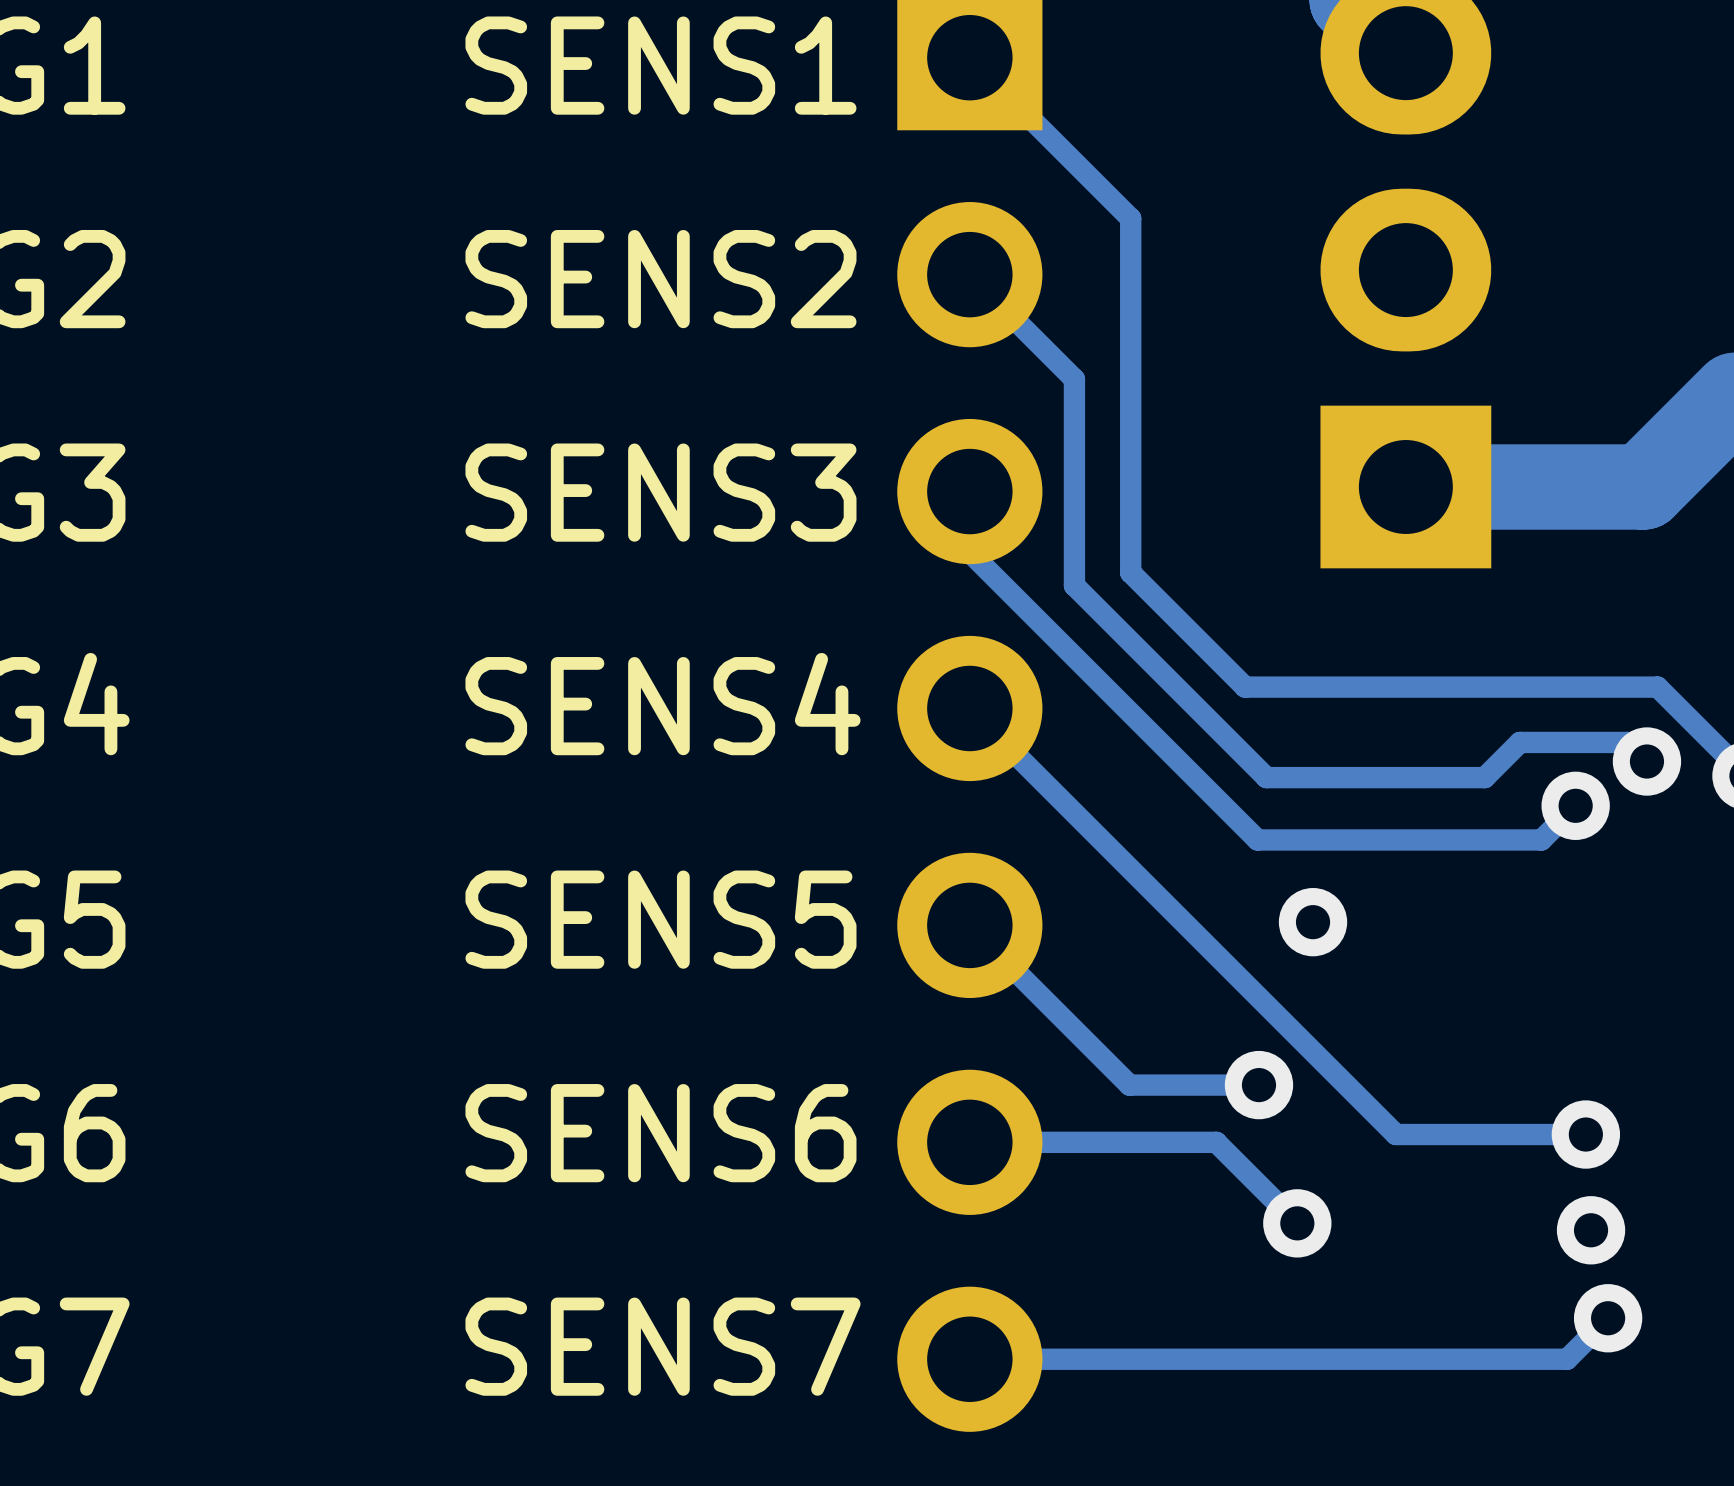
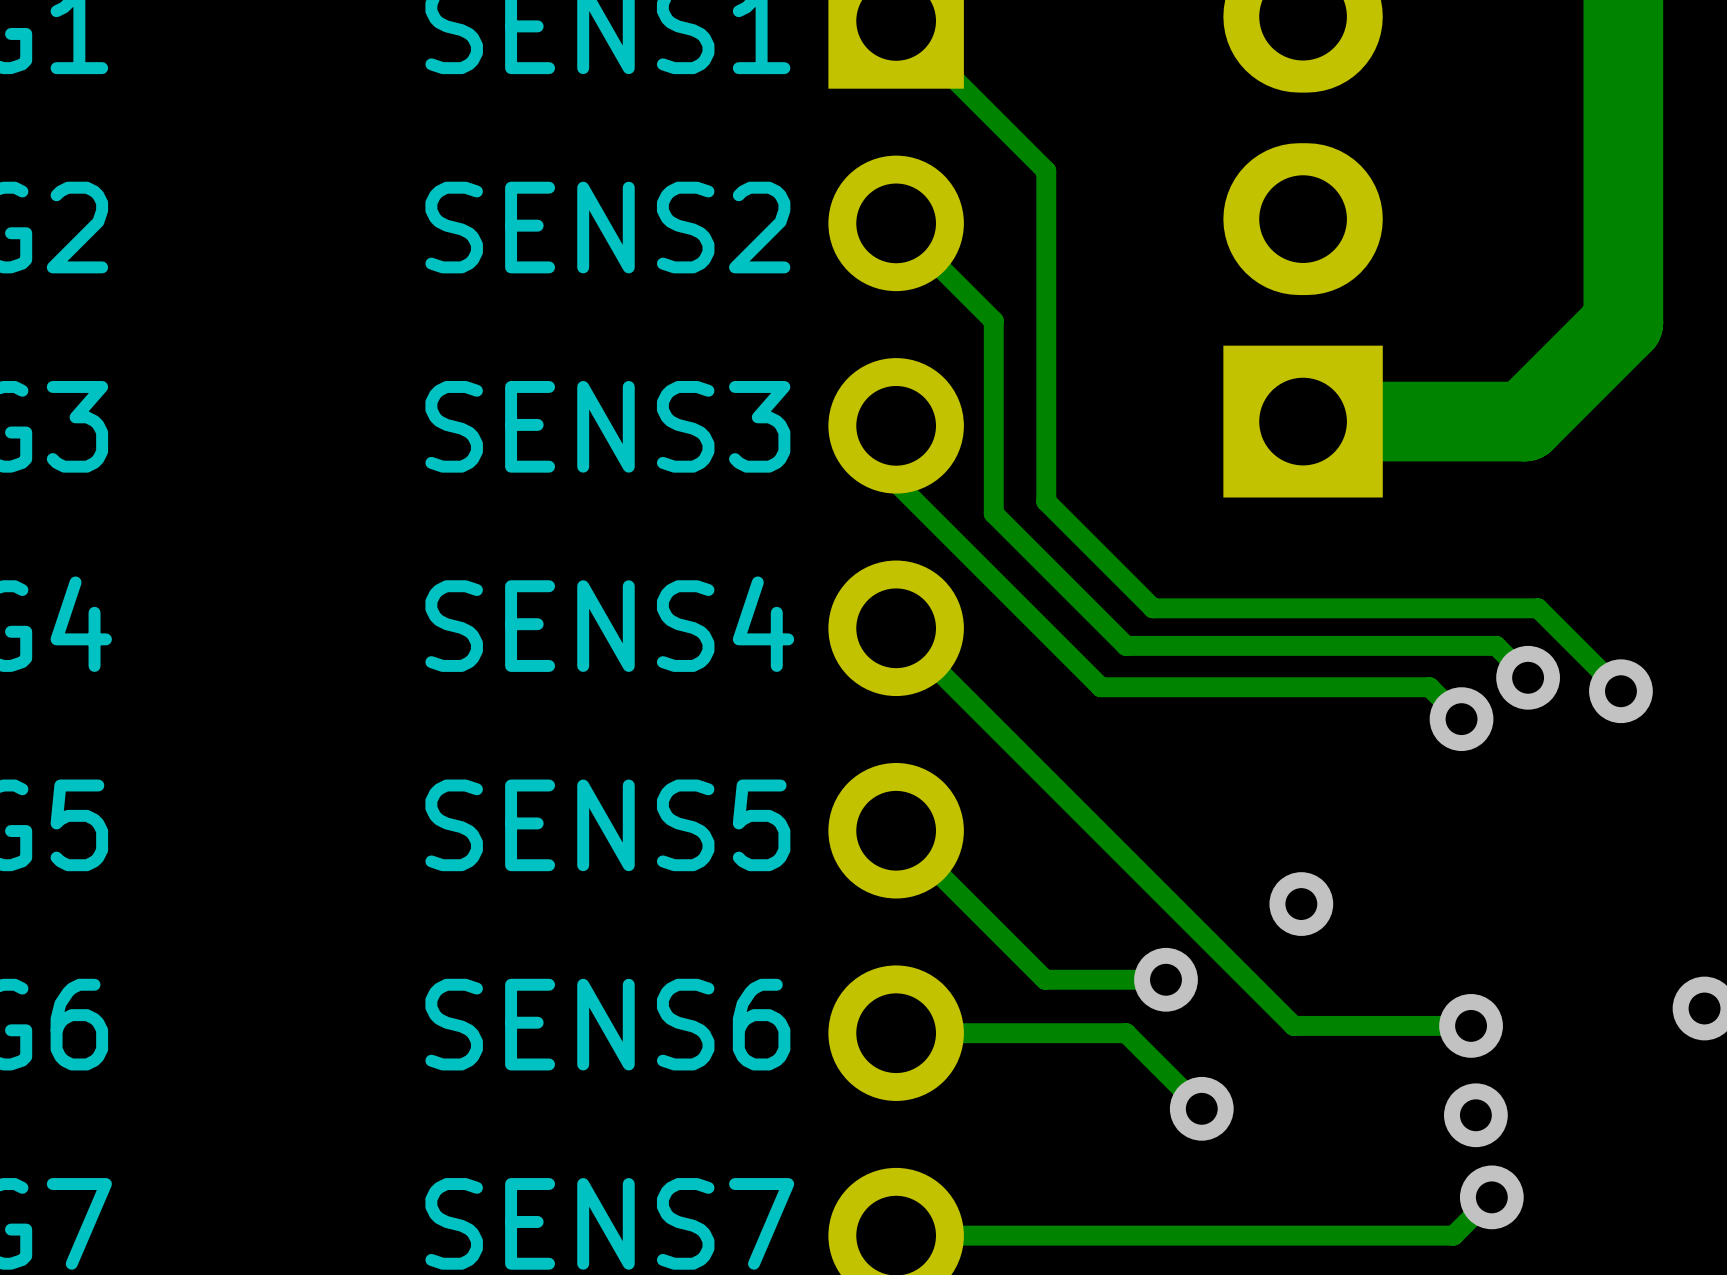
track: (1216, 727) (1266, 777) (1484, 777) (1519, 742) (1627, 742) -> (1126, 645) (1496, 645) (1510, 659)
track: (1189, 771) (1257, 839) (1541, 839) (1575, 805) -> (1100, 687) (1429, 687) (1461, 719)
via position: (1313, 922) -> (1301, 904)

